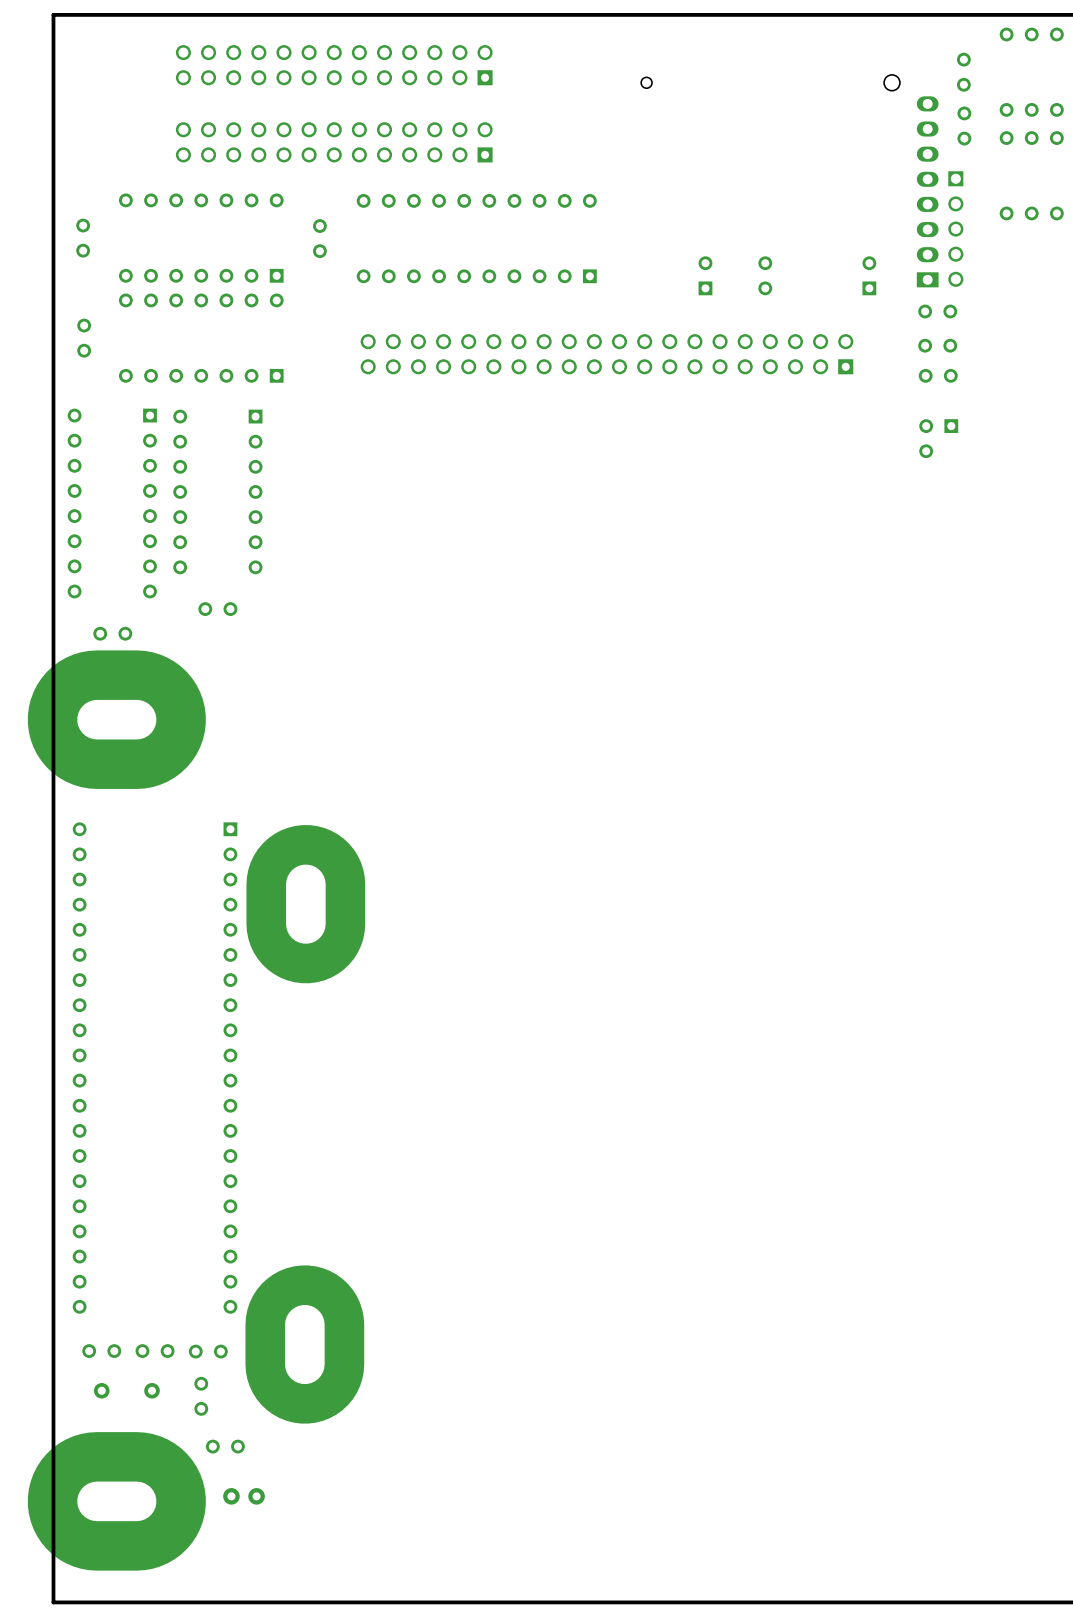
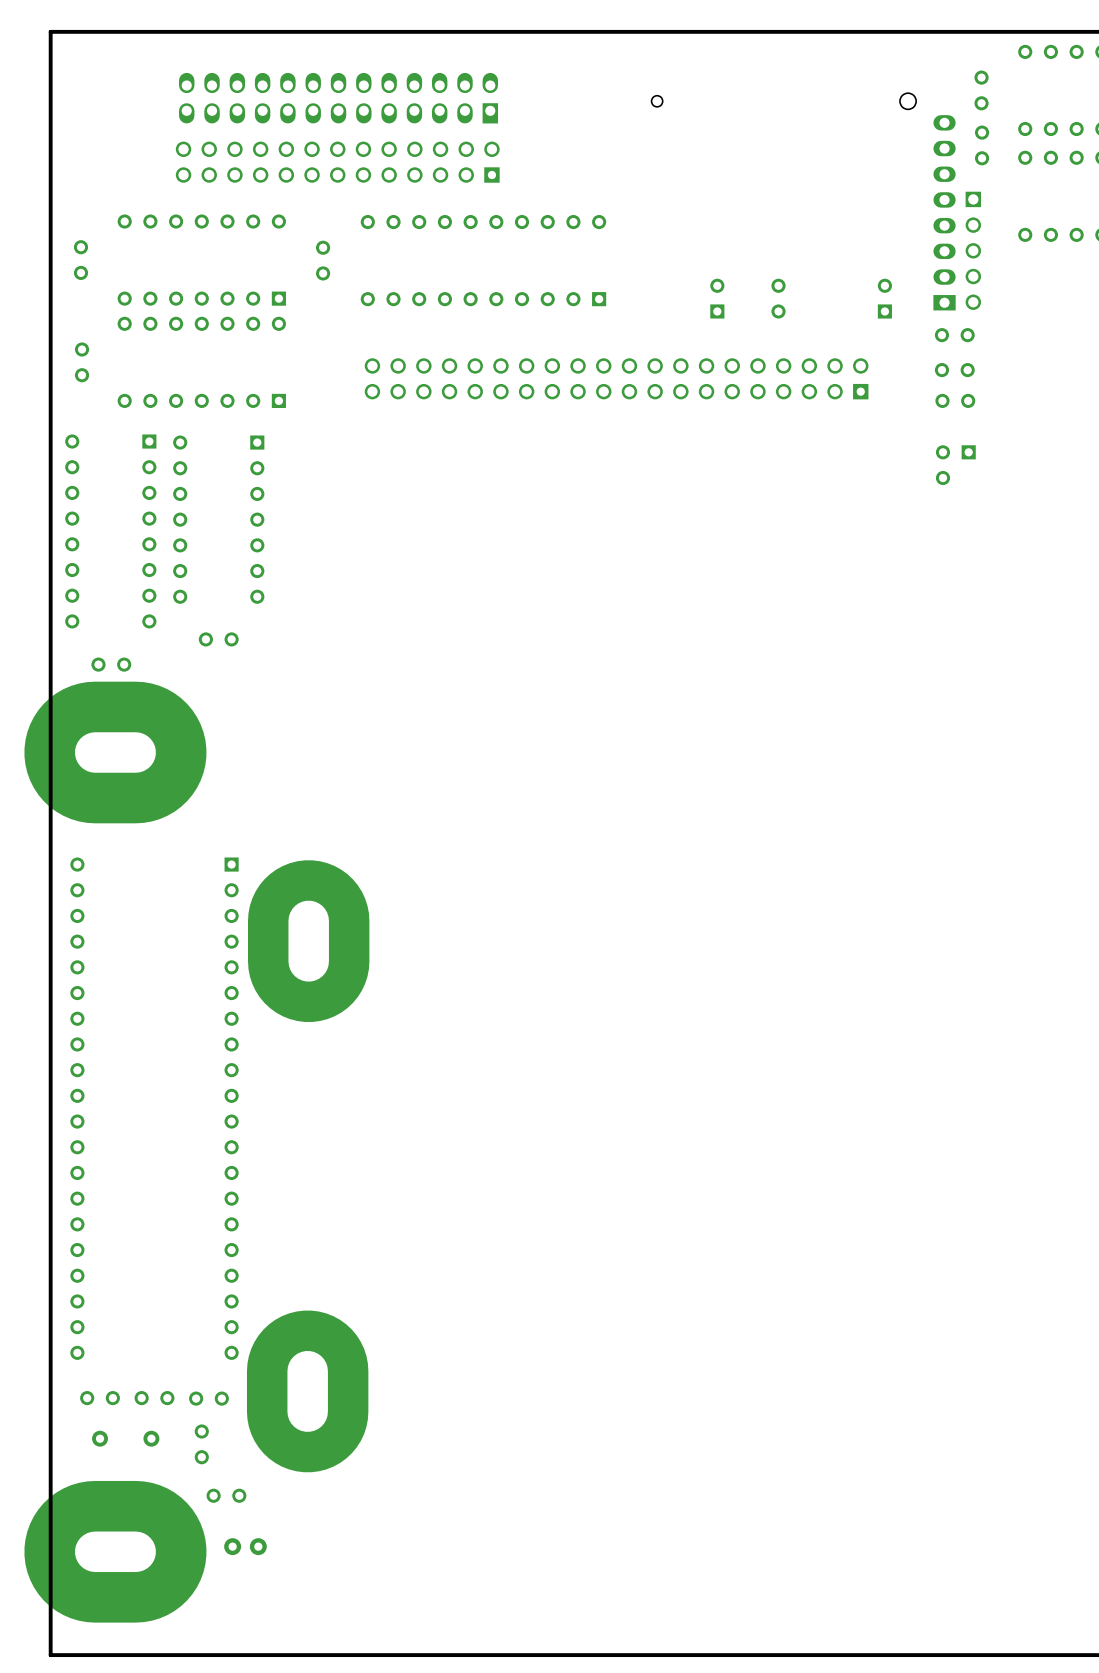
part: (334, 65) -> none
part: none -> (338, 98)

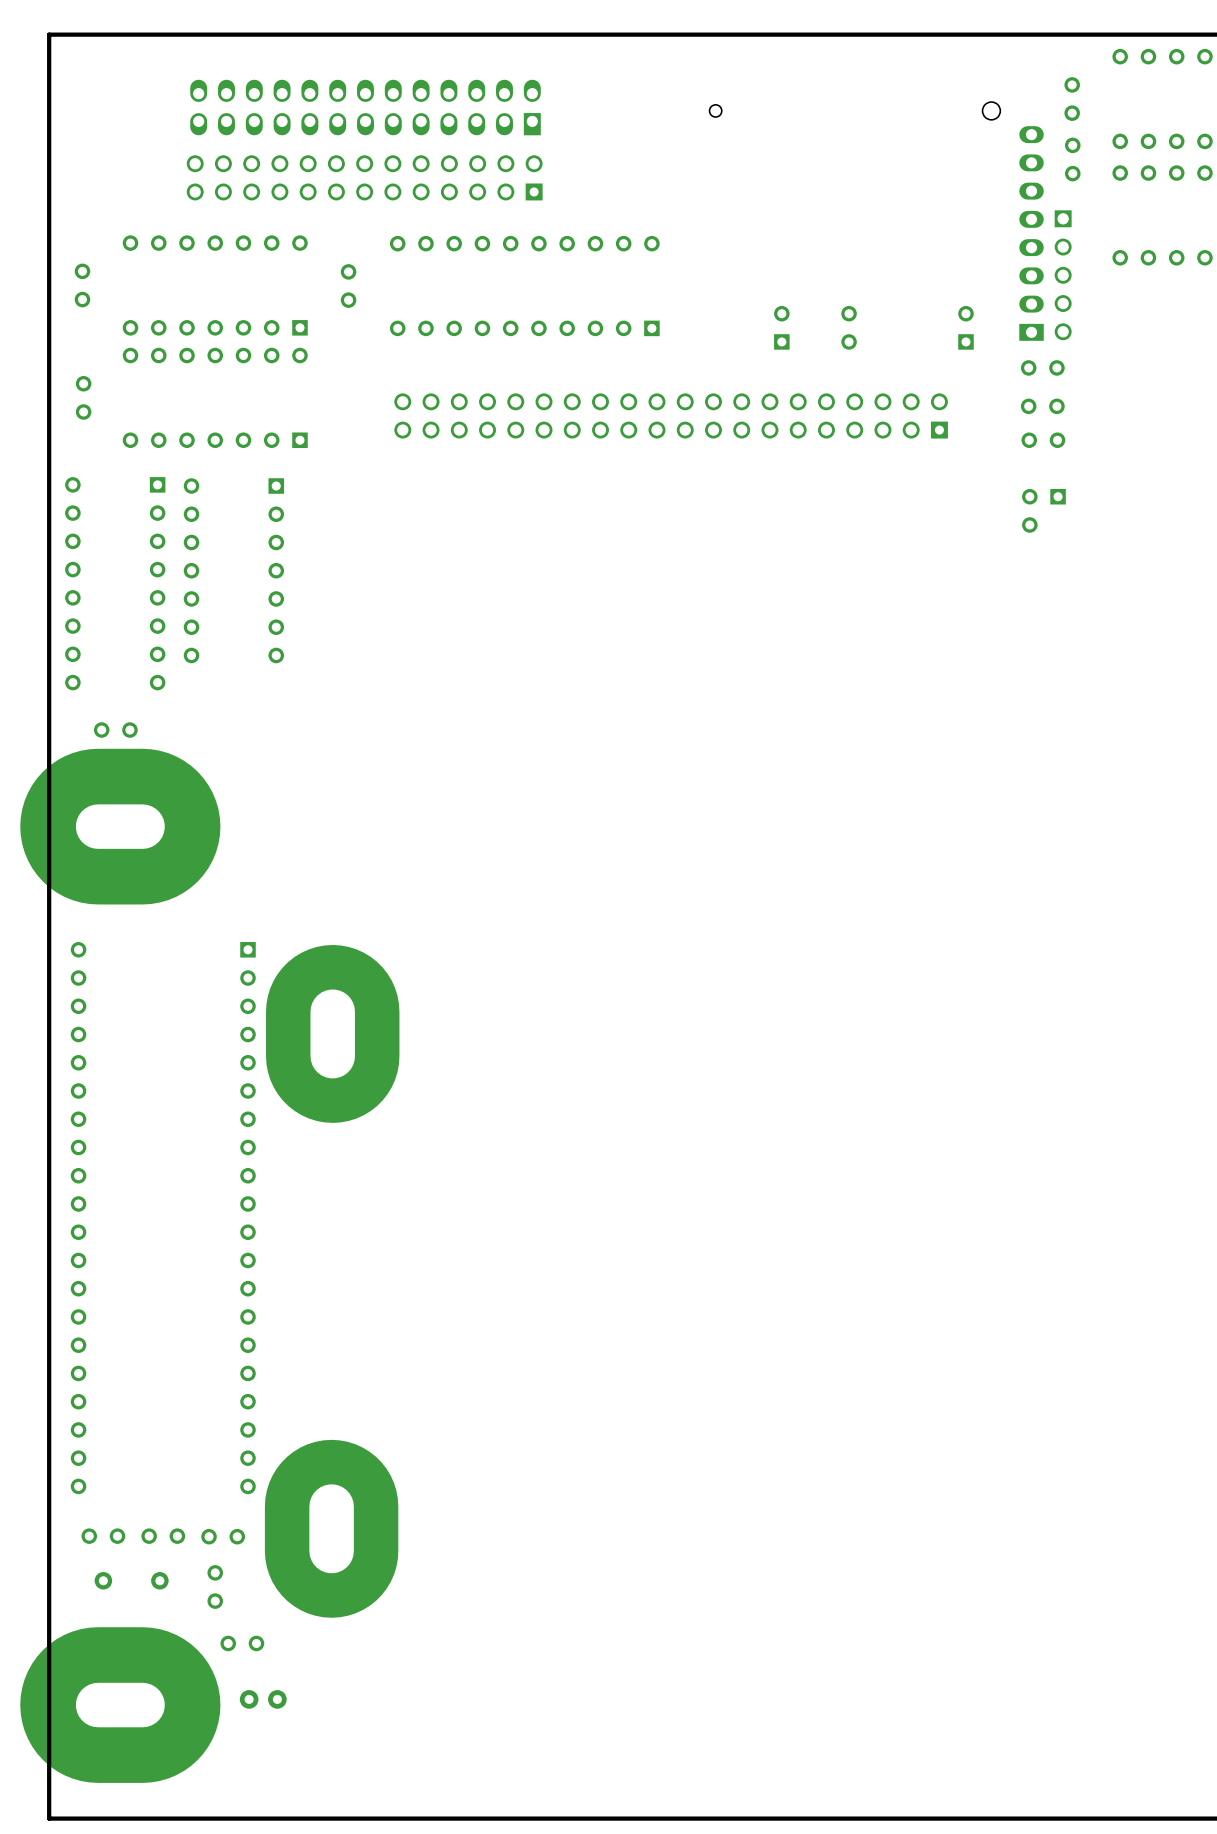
part: (218, 639) -> none

